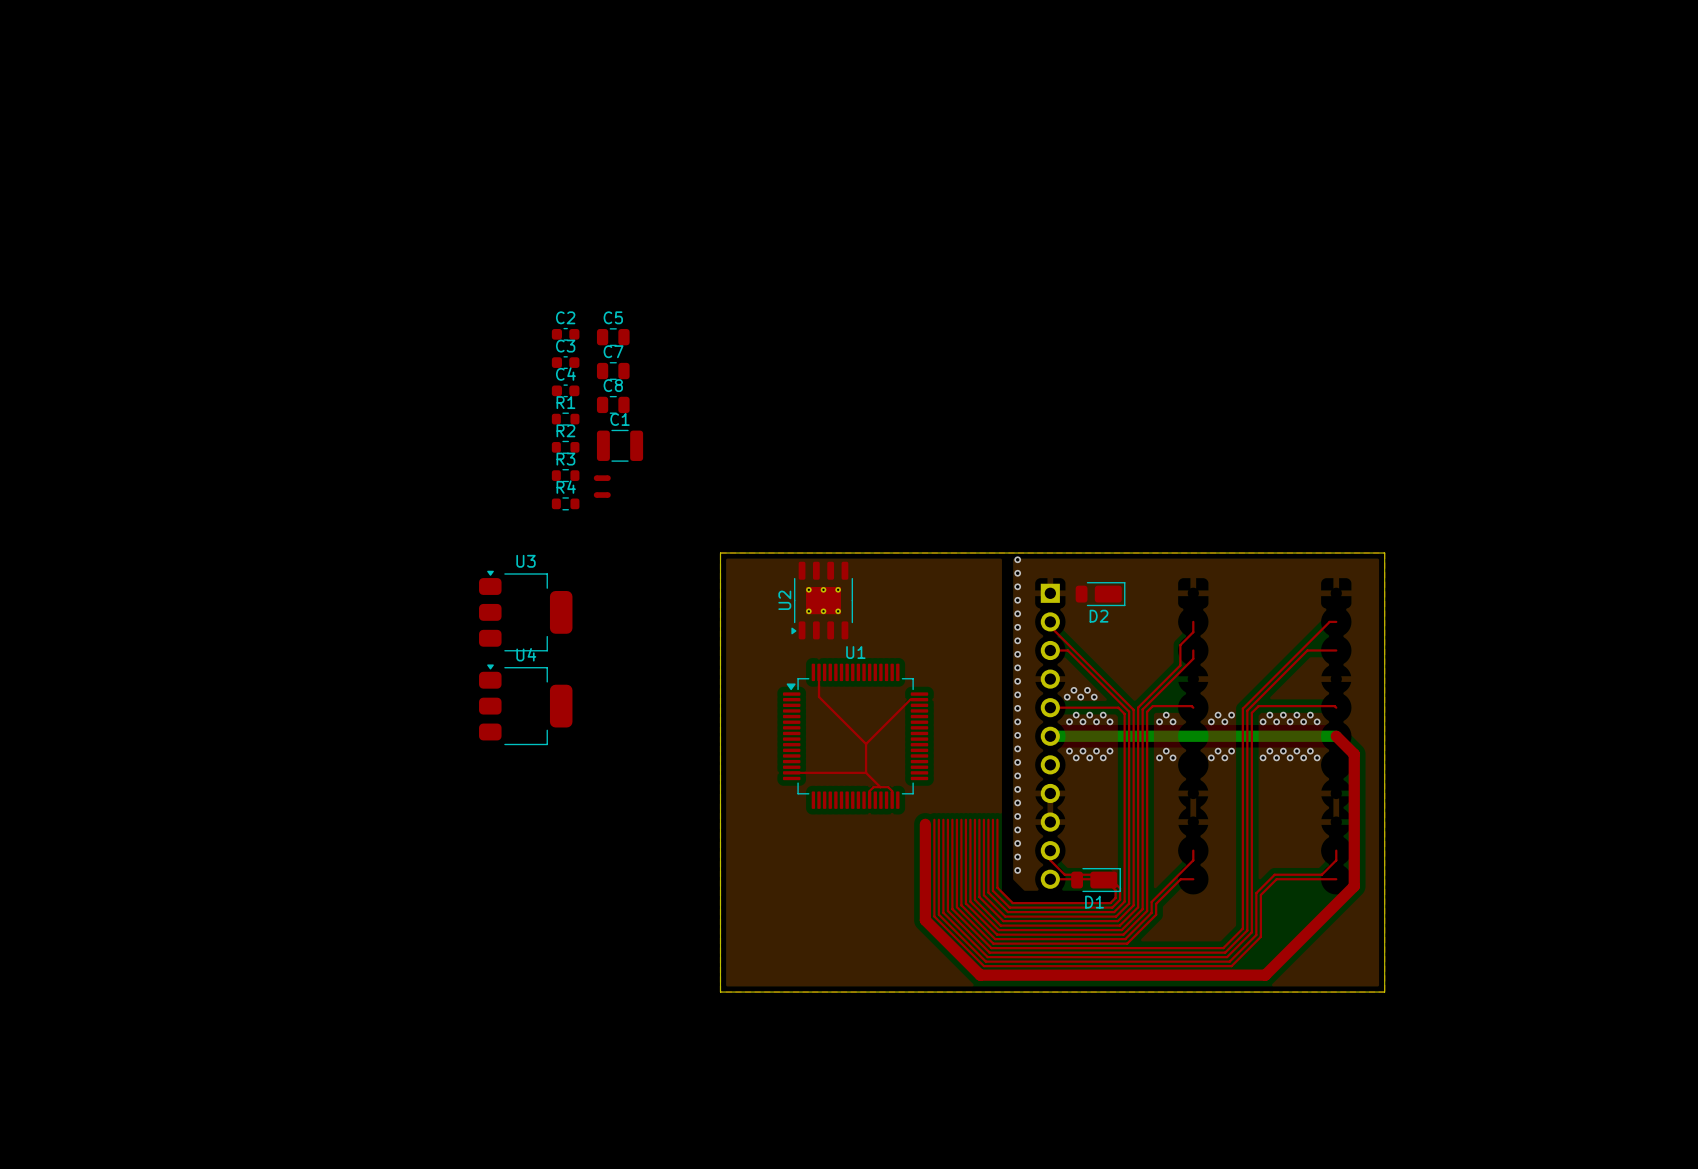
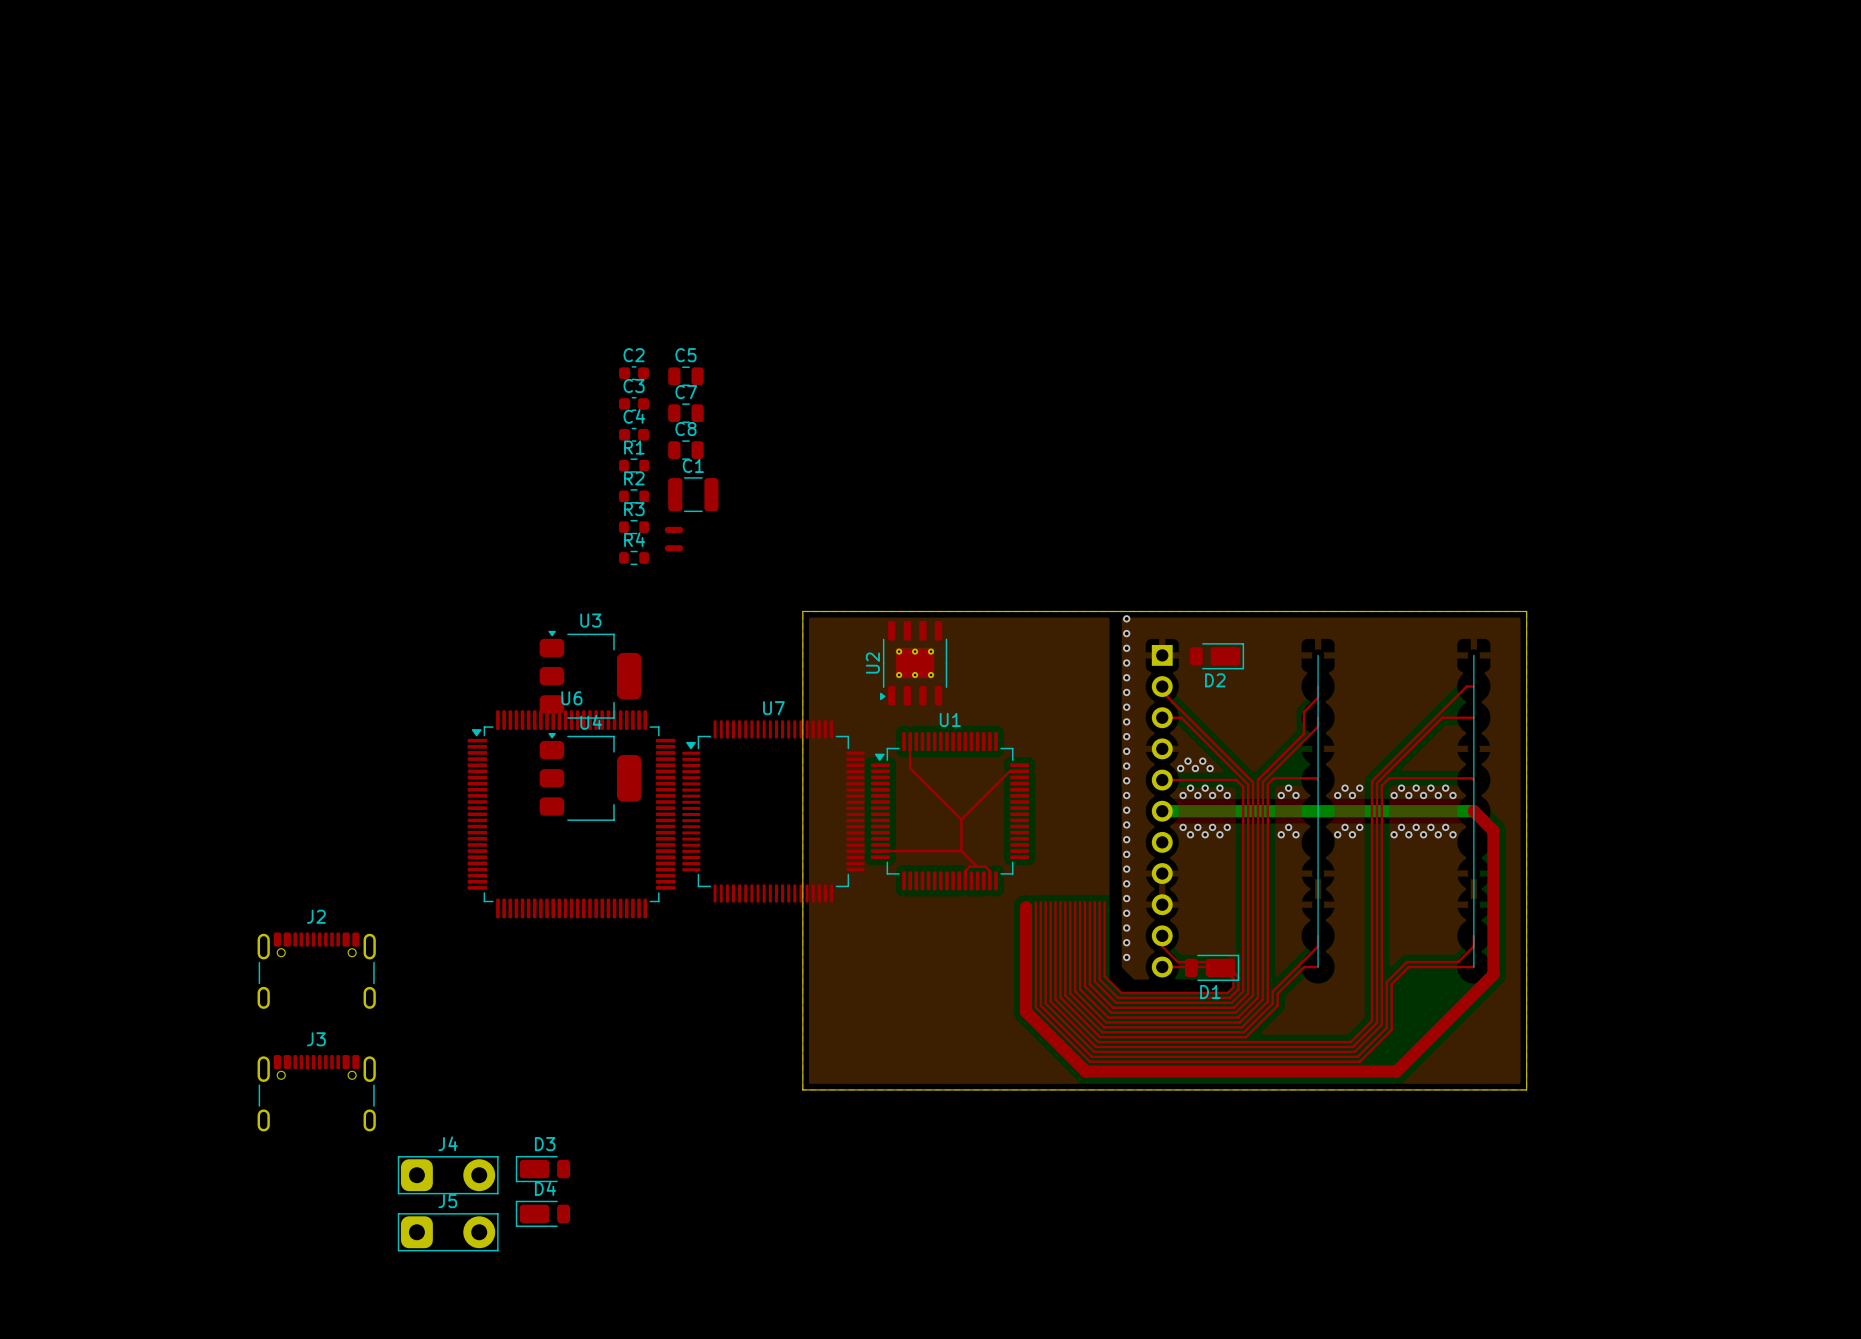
line: none -> (1318, 655) (1318, 967)
line: none -> (1473, 655) (1473, 967)
U7: none -> (773, 811)
U6: none -> (571, 814)
J2: none -> (316, 970)
J3: none -> (316, 1093)
D3: none -> (542, 1169)
J4: none -> (448, 1175)
D4: none -> (542, 1213)
J5: none -> (448, 1232)

